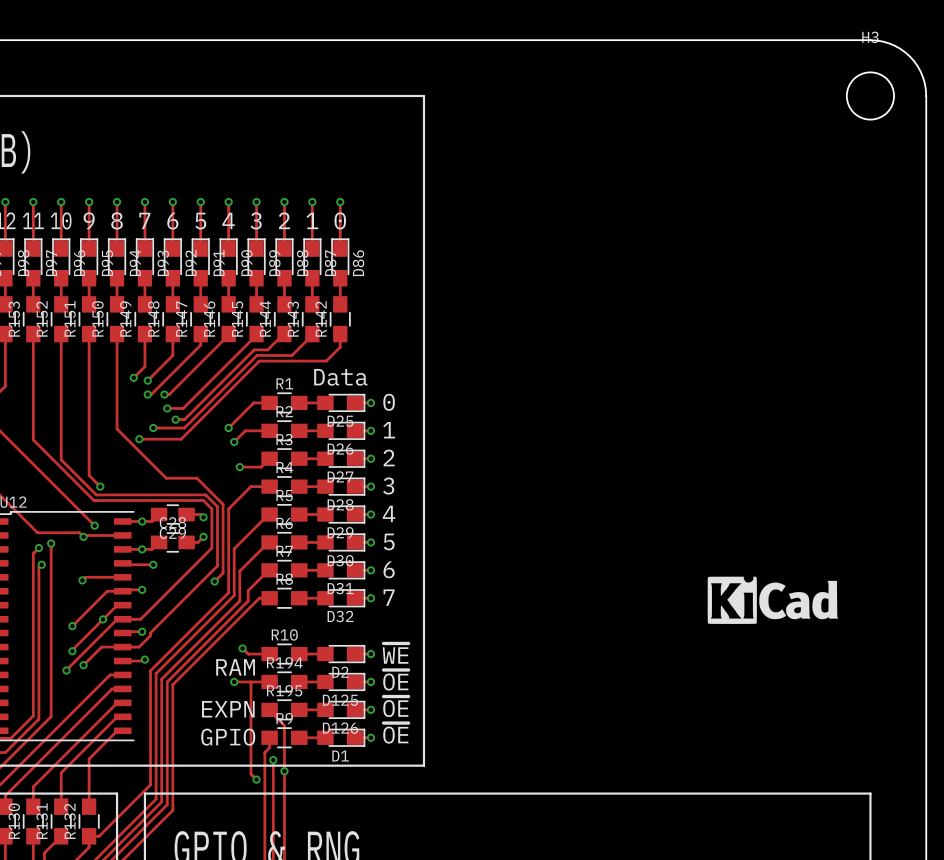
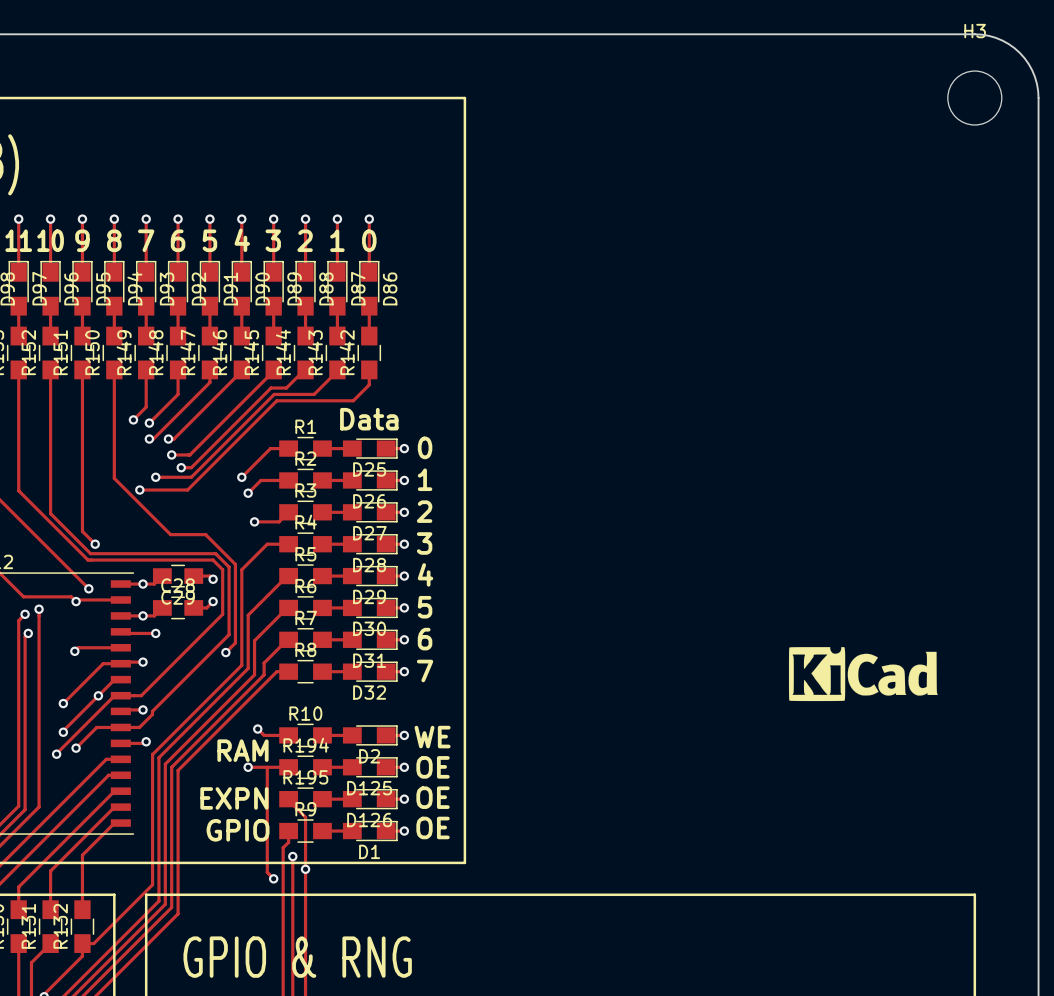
text: ~{WE} (395, 653) -> WE (432, 737)
text: ~{OE} (395, 680) -> OE (433, 767)
text: ~{OE} (395, 706) -> OE (433, 797)
text: ~{OE} (395, 733) -> OE (433, 827)

